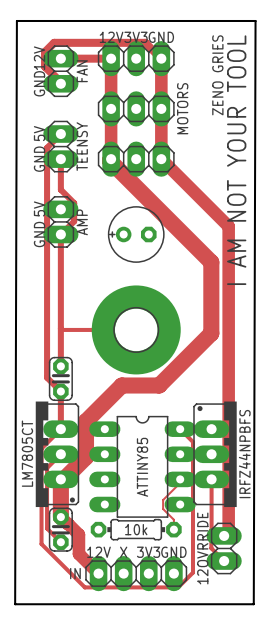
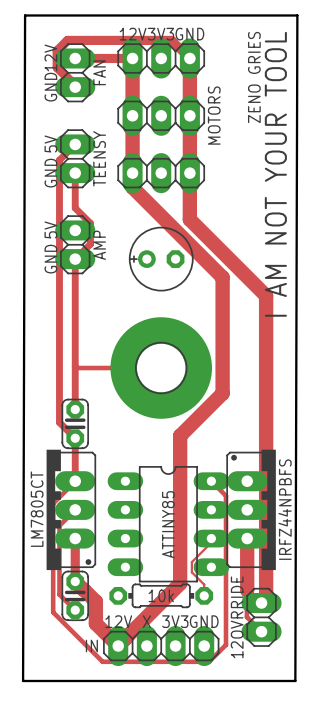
track: (111, 159) (110, 161) (211, 262) (211, 333) (159, 385) (121, 385) (85, 421) (85, 457) (63, 479) (60, 479) (62, 479) -> (132, 173) (132, 187) (222, 277) (222, 393) (180, 435) (180, 583) (118, 646)
track: (161, 159) (228, 226) (228, 531) -> (189, 173) (189, 219) (266, 295) (266, 598)
track width: thick (60, 479) (60, 517) -> thin (75, 538) (75, 581)
track width: thin (211, 479) (211, 525) -> thick (247, 538) (247, 590)

